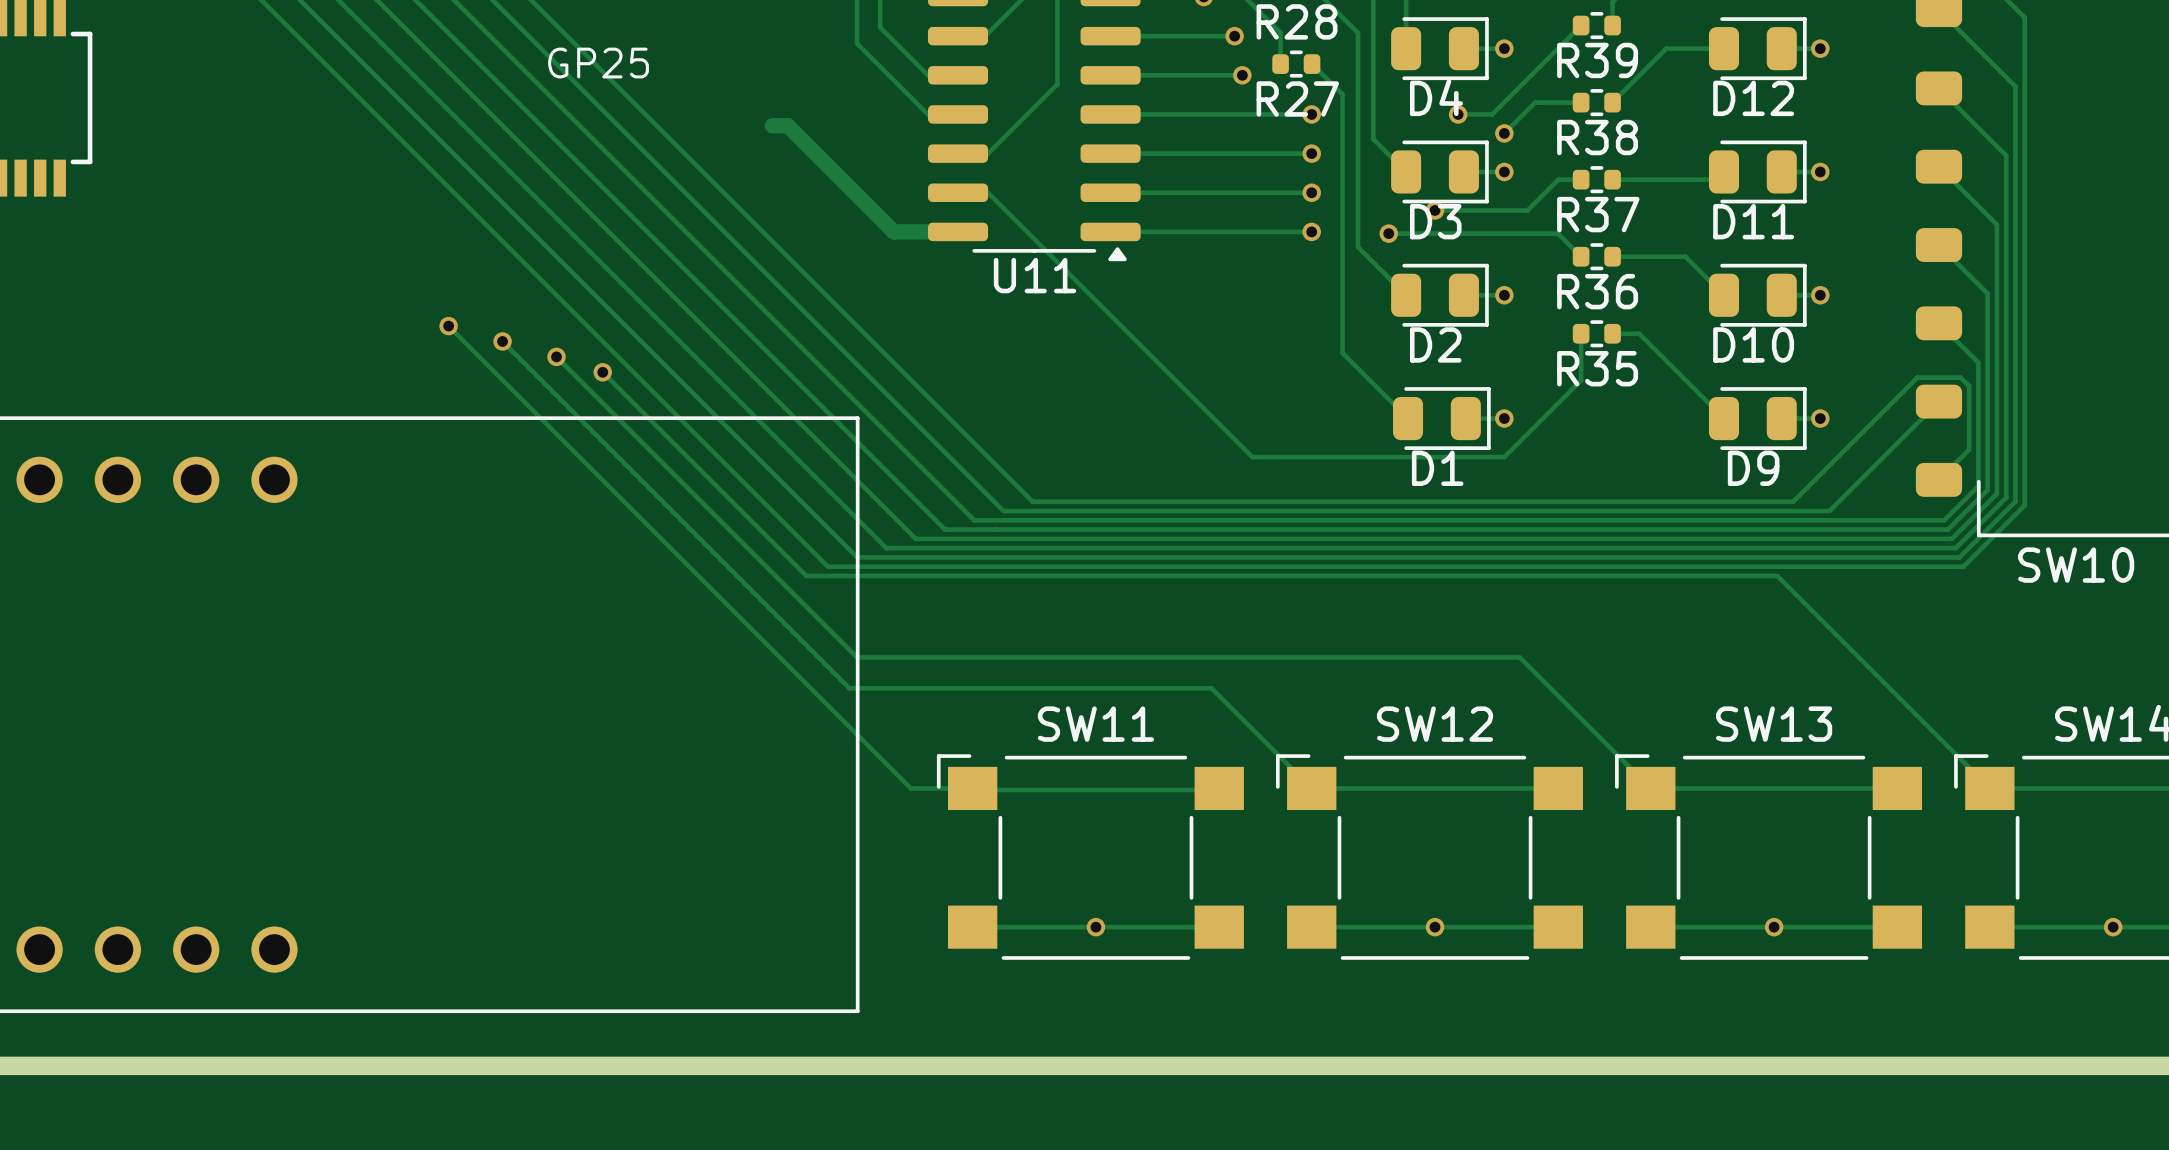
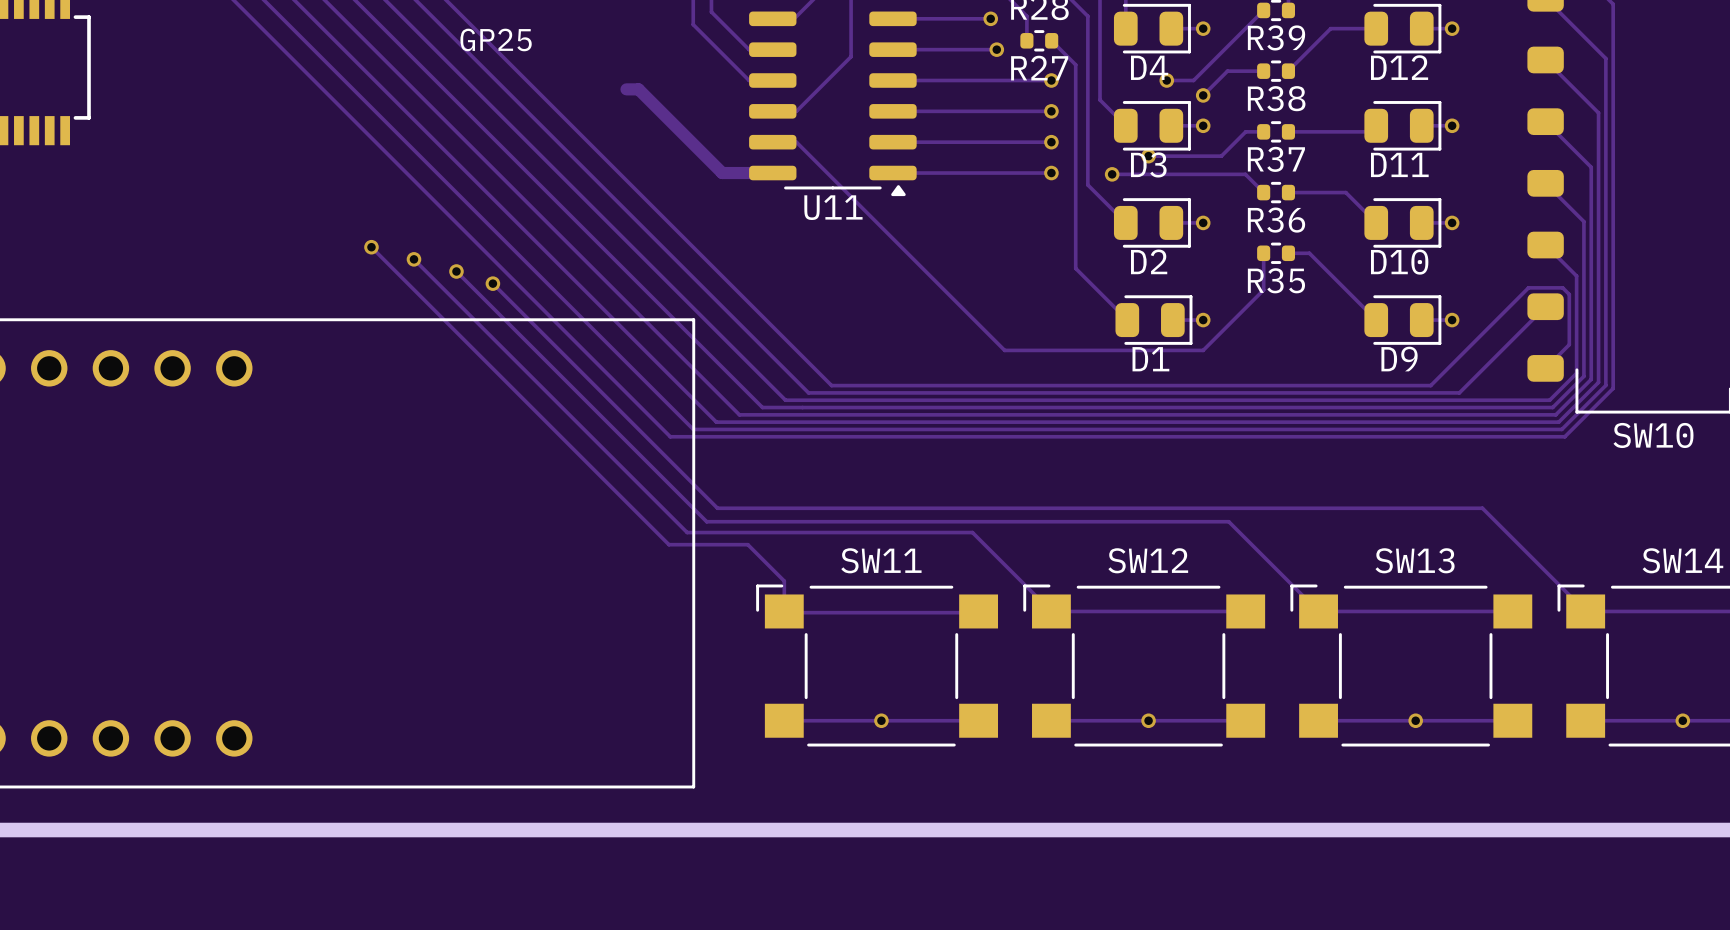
track: (806, 575) (1777, 575) (1858, 657) -> none
track: (857, 657) (887, 657) -> (653, 444) (717, 508)
track: none -> (693, 508) (706, 521) (1228, 521)
track: (1519, 657) (1536, 674) -> (1215, 508) (1482, 508)
track: (826, 703) (911, 788) (972, 788) -> (668, 544) (747, 544) (784, 581) (784, 611)

